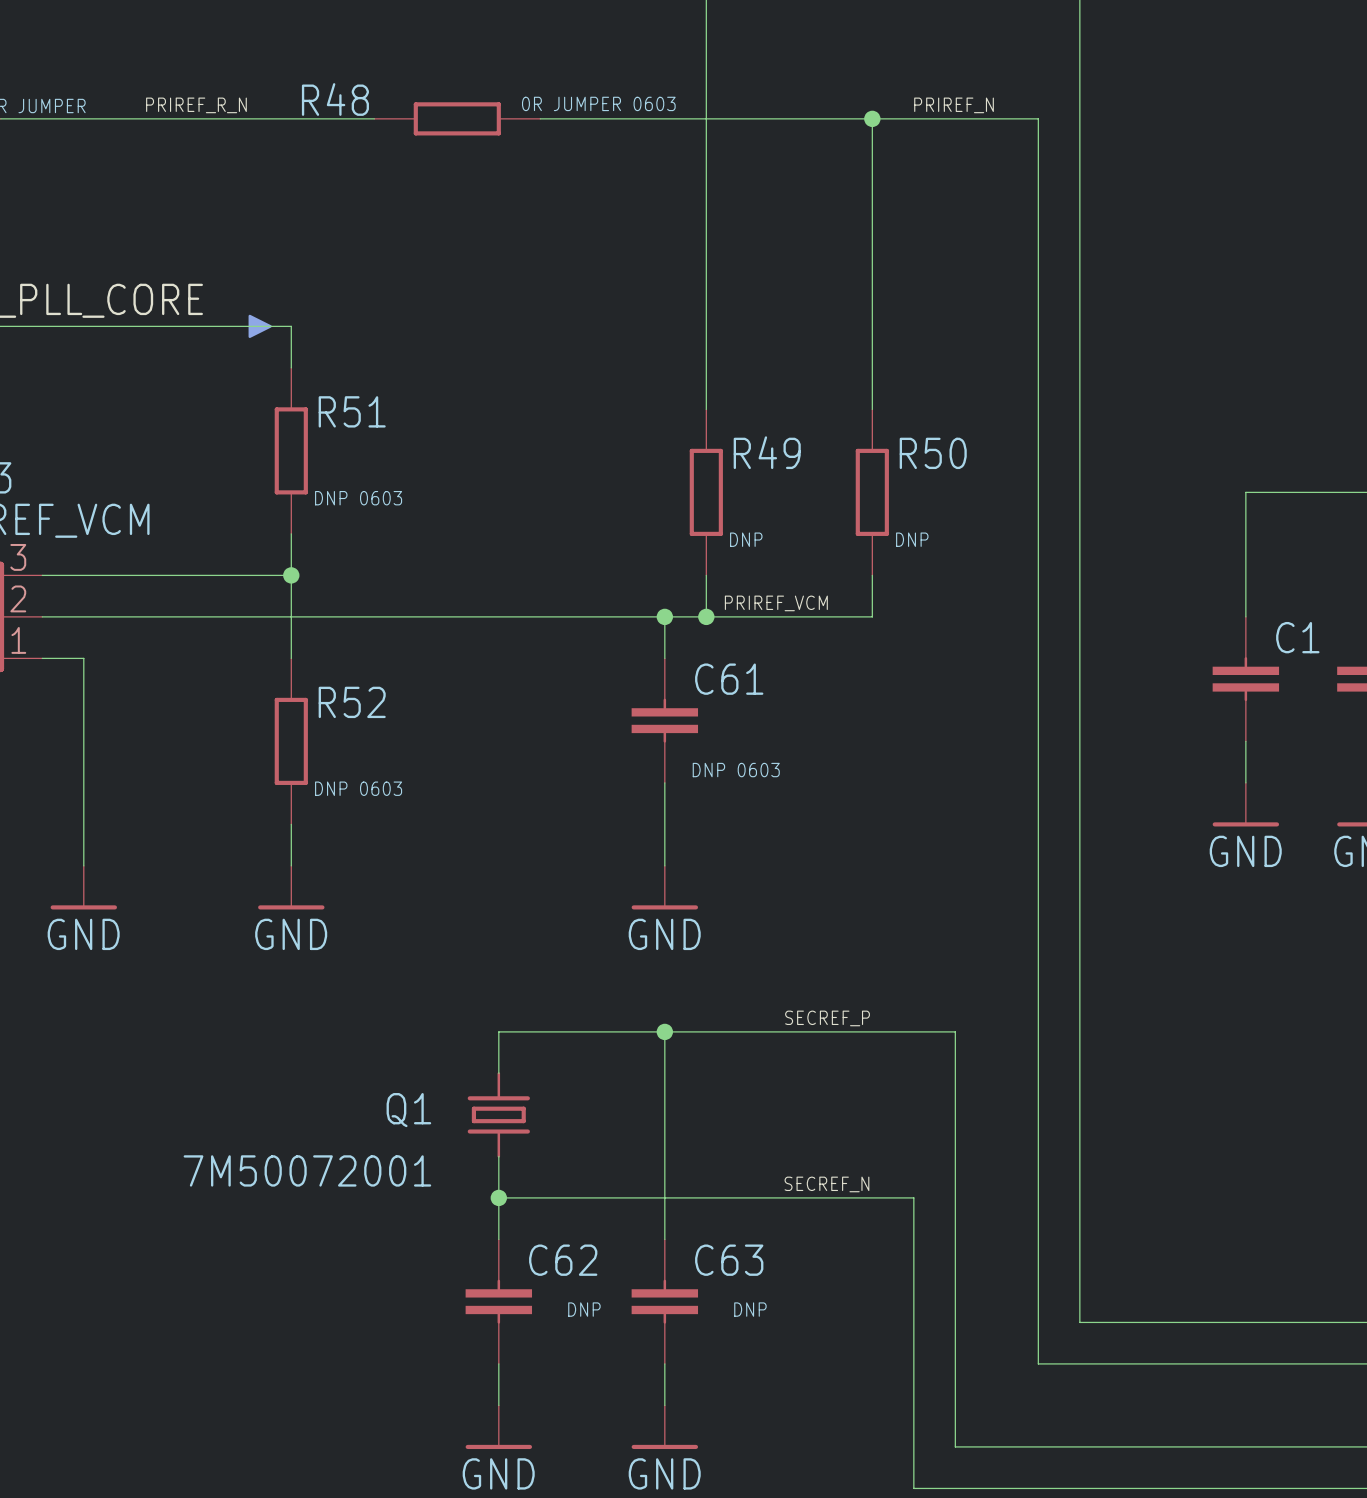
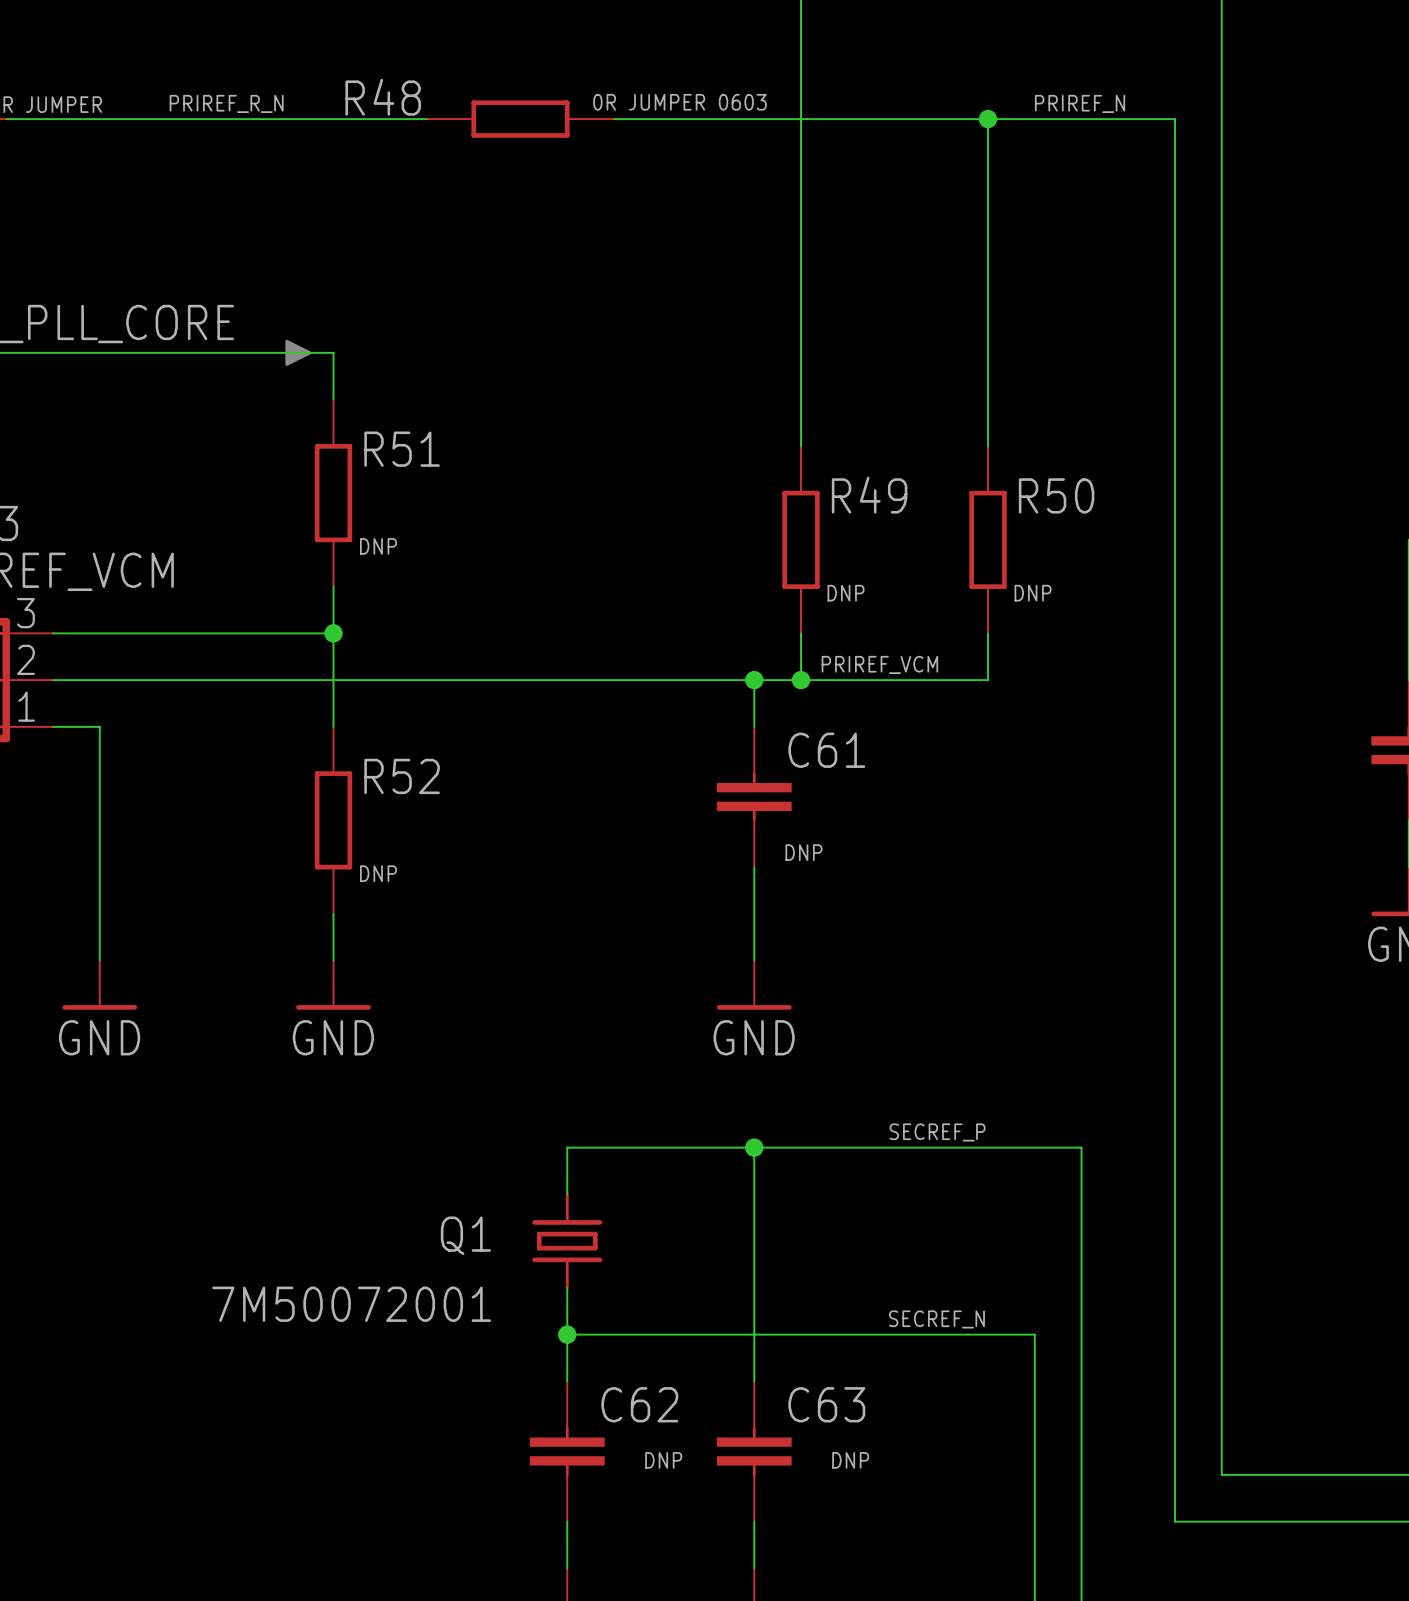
R51 value: DNP 0603 (358, 498) -> DNP (378, 546)
C61 value: DNP 0603 (736, 770) -> DNP (803, 852)
R52 value: DNP 0603 (358, 788) -> DNP (378, 873)

